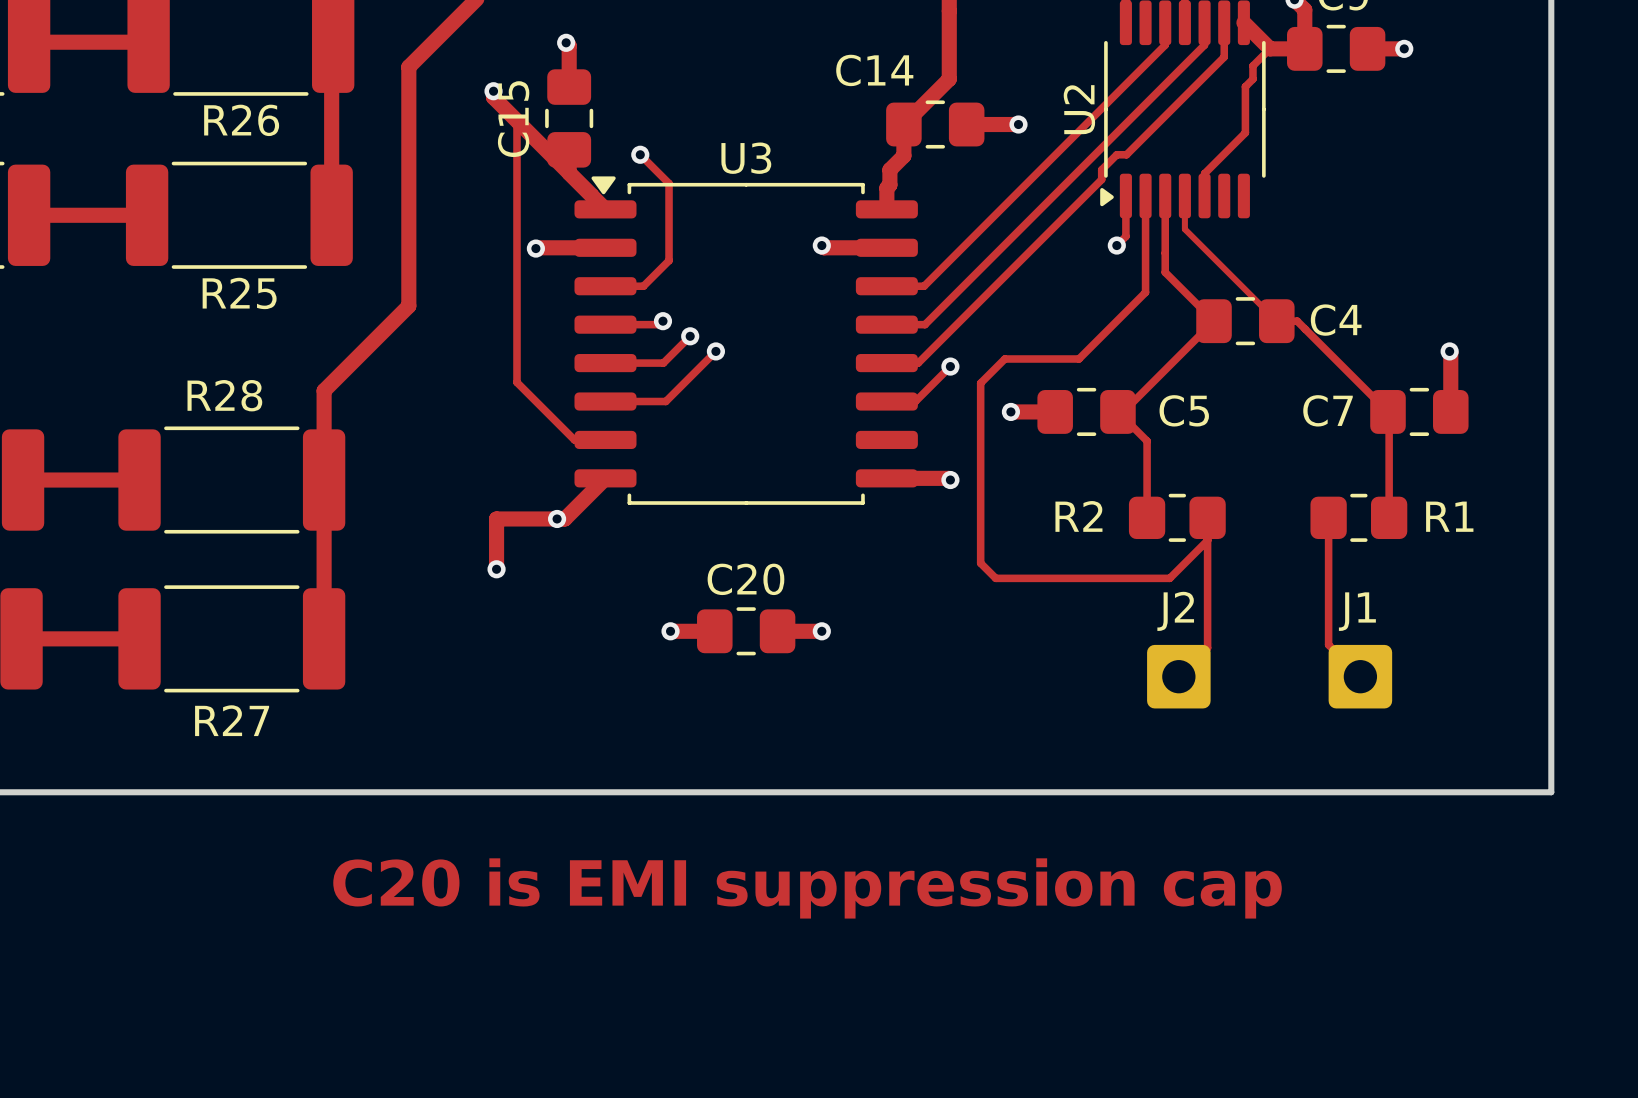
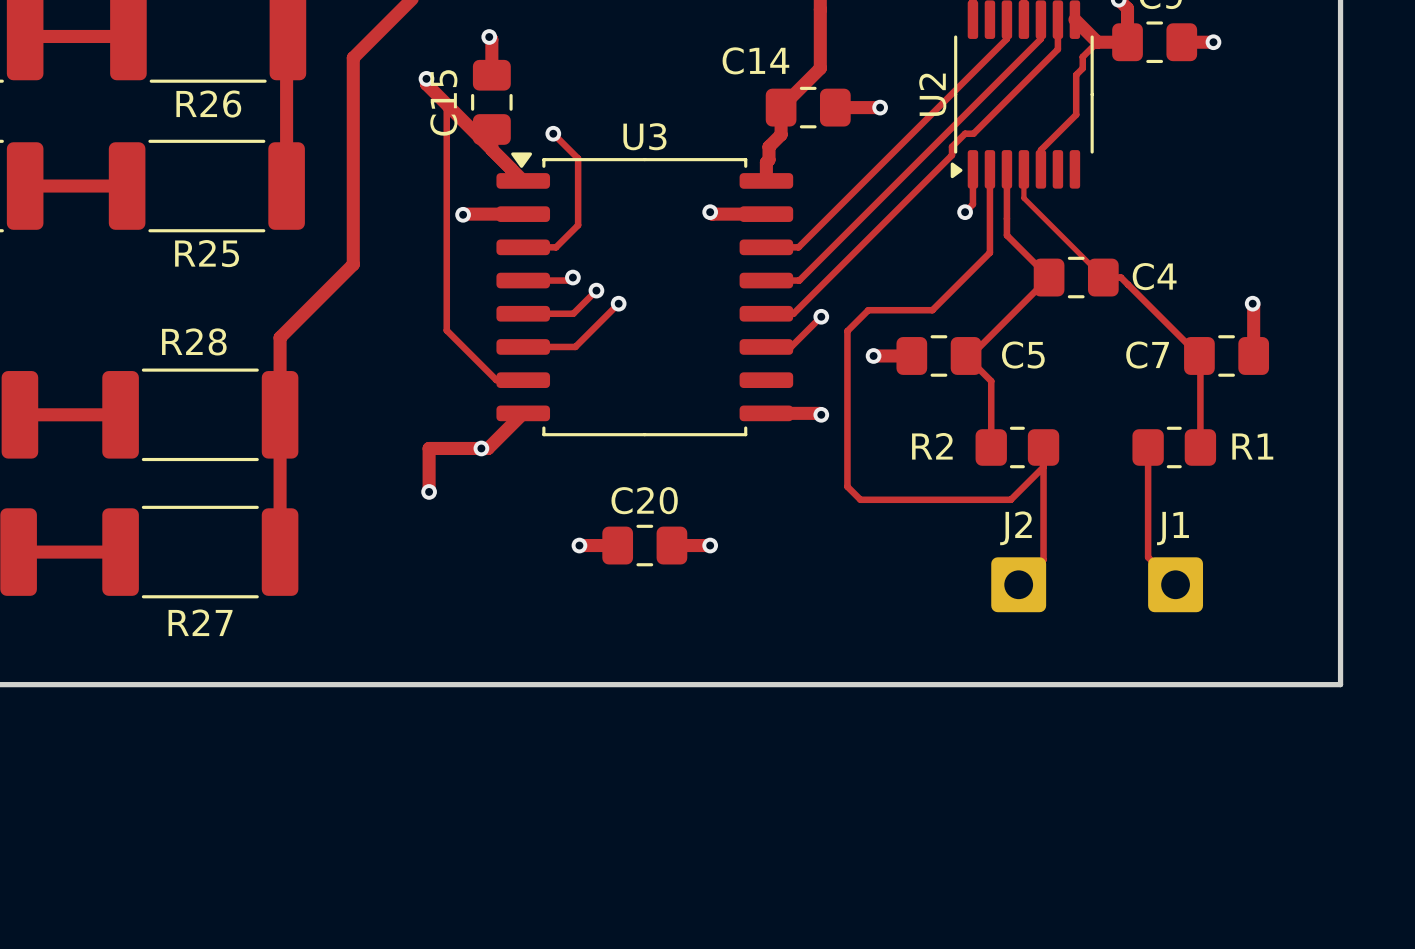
text: C20 is EMI suppression cap (807, 888) -> none

